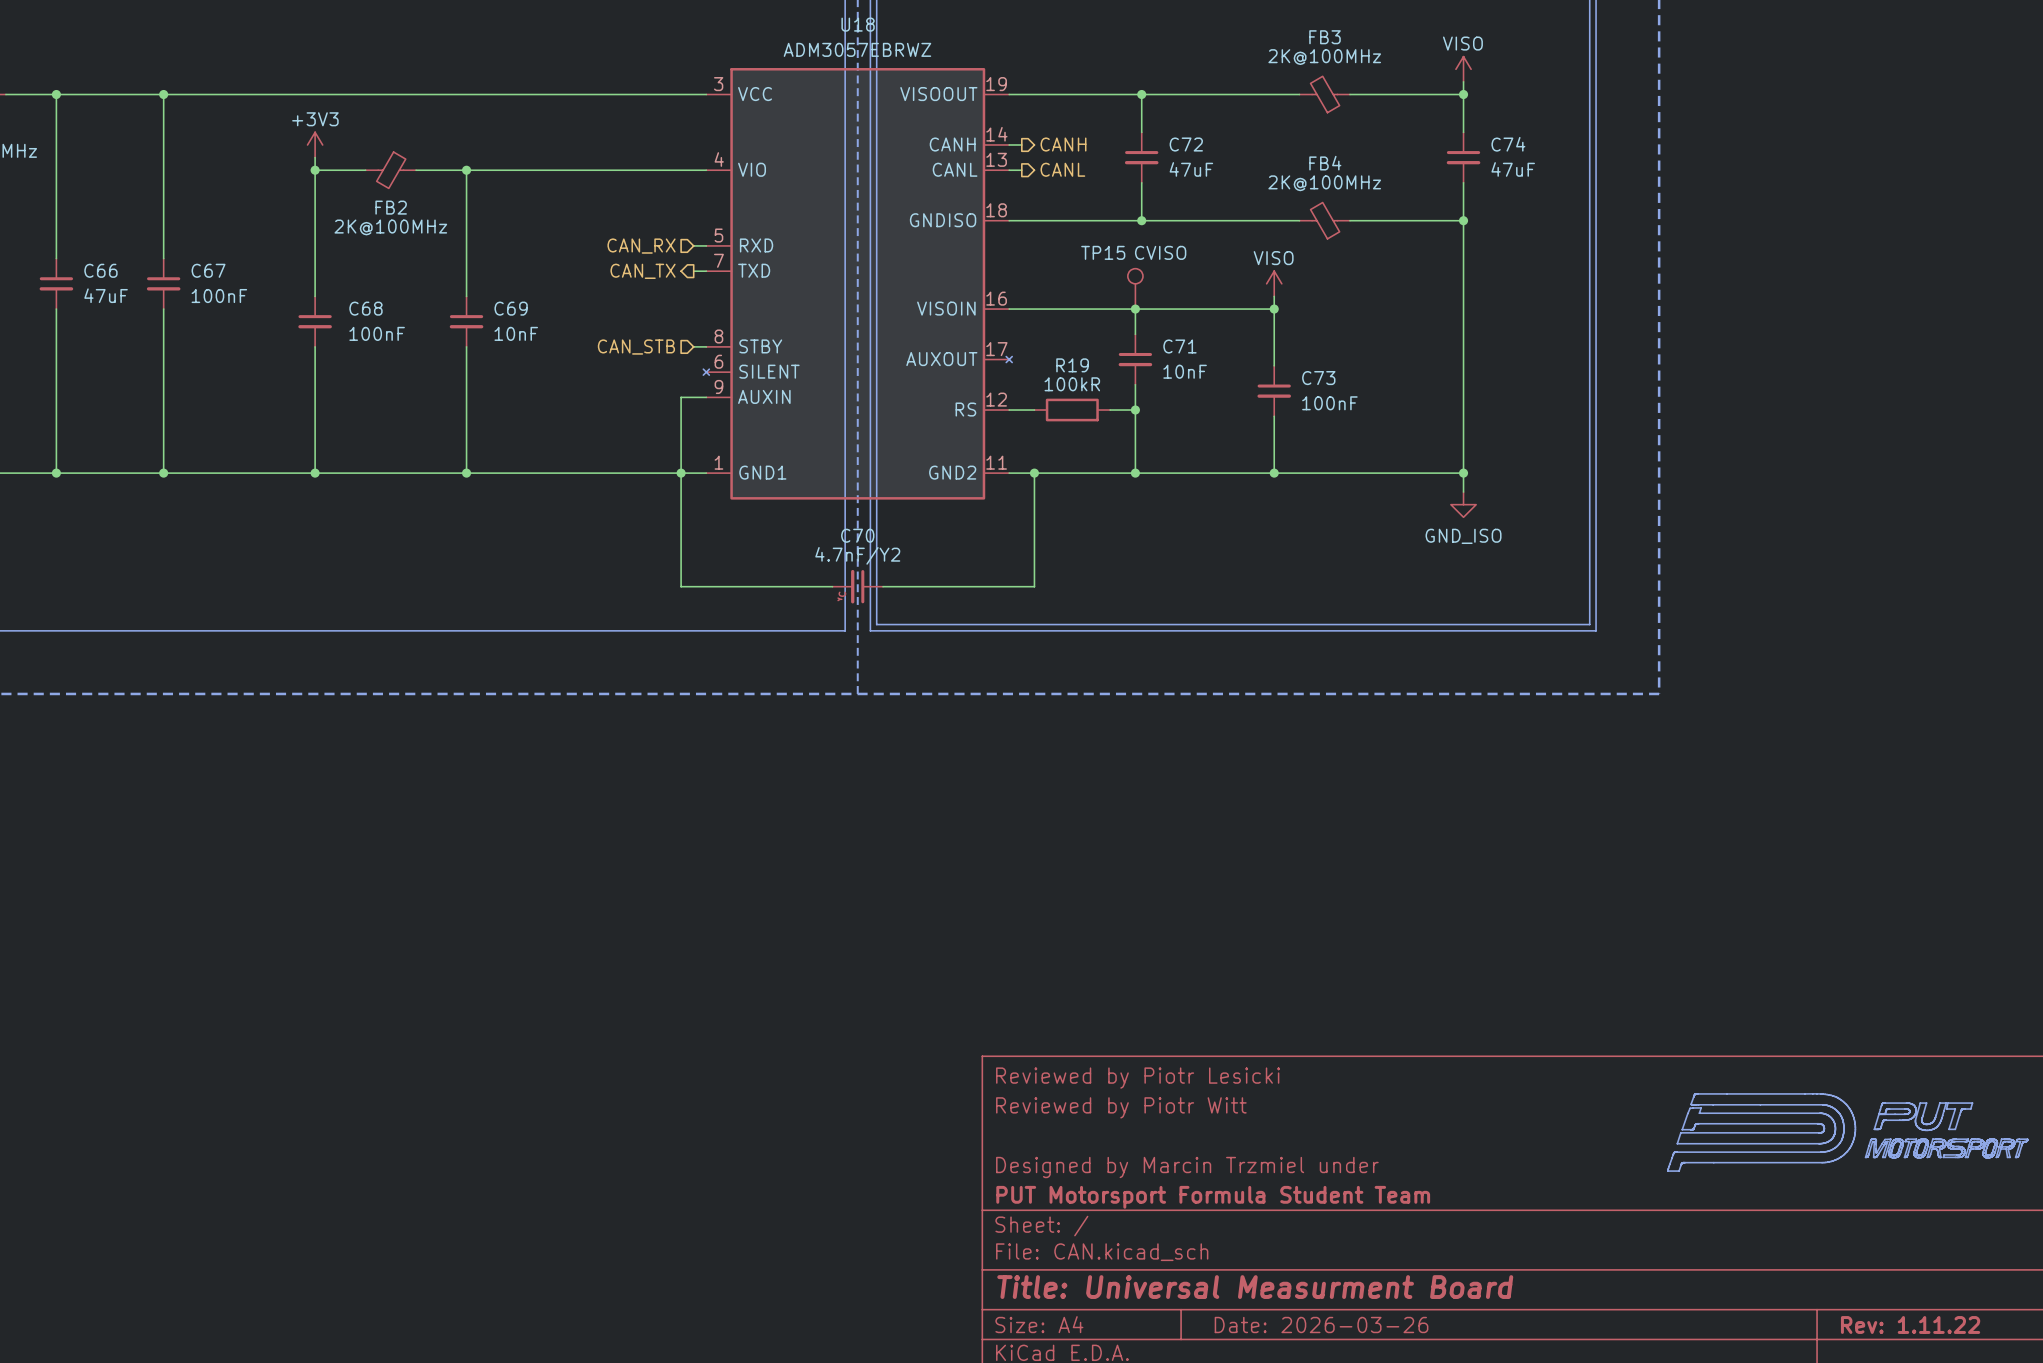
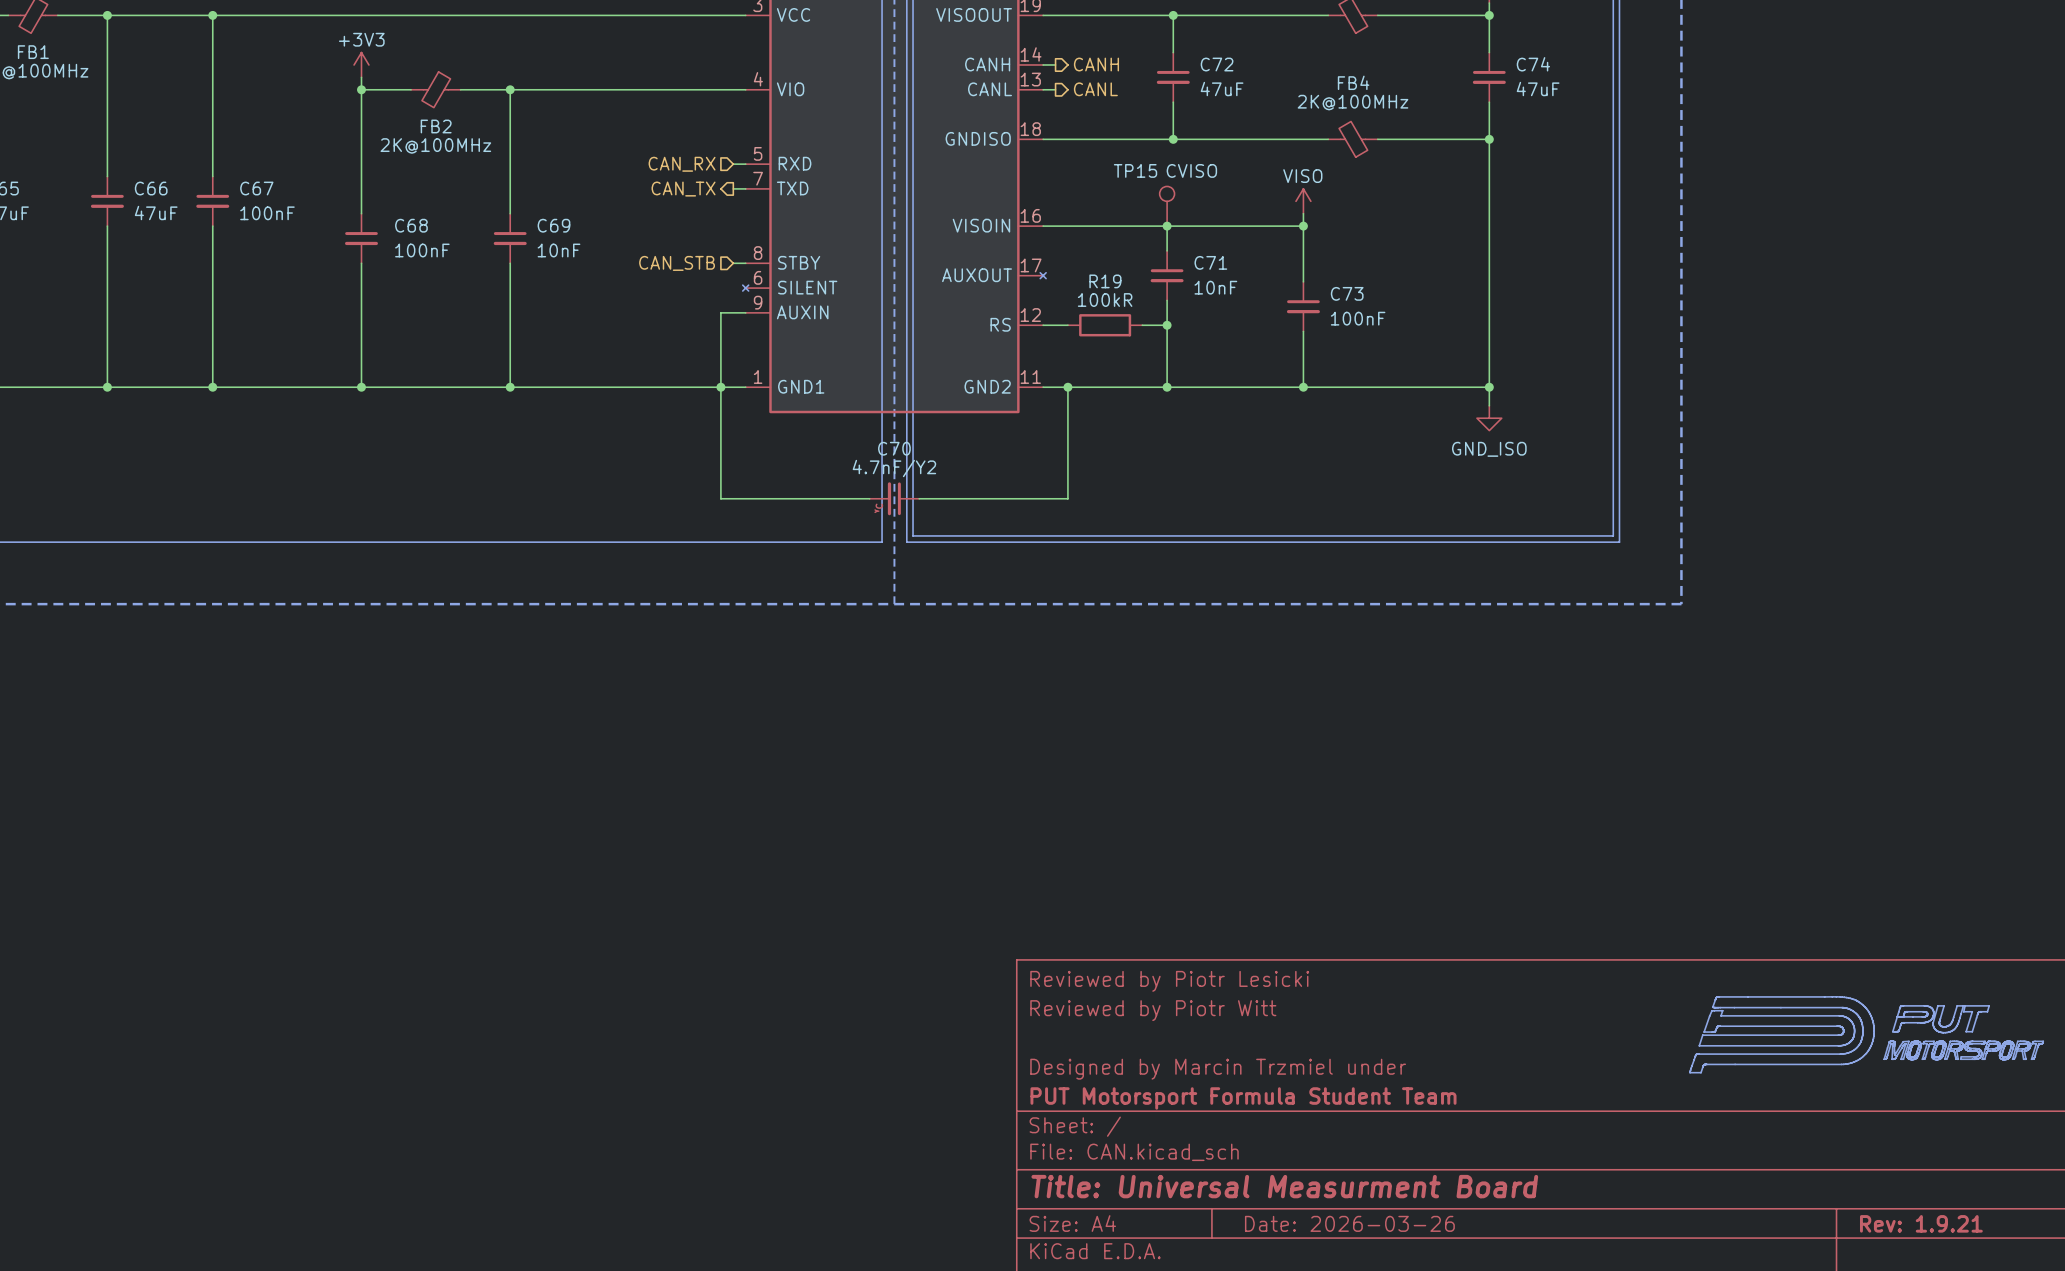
title block: Rev: 1.11.22 (1910, 1325) -> Rev: 1.9.21 (1921, 1223)

